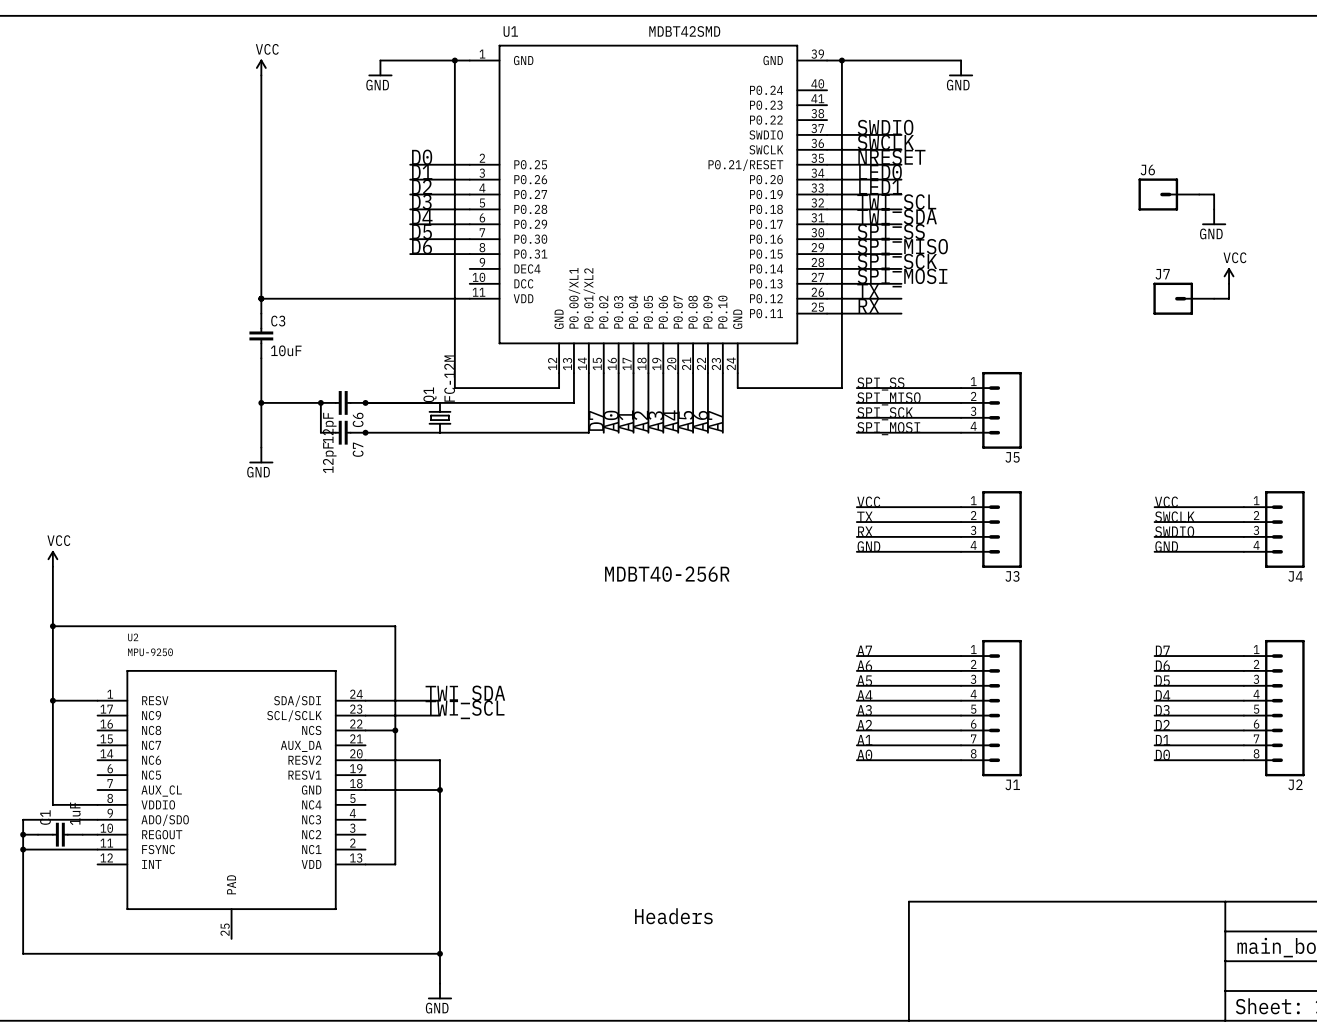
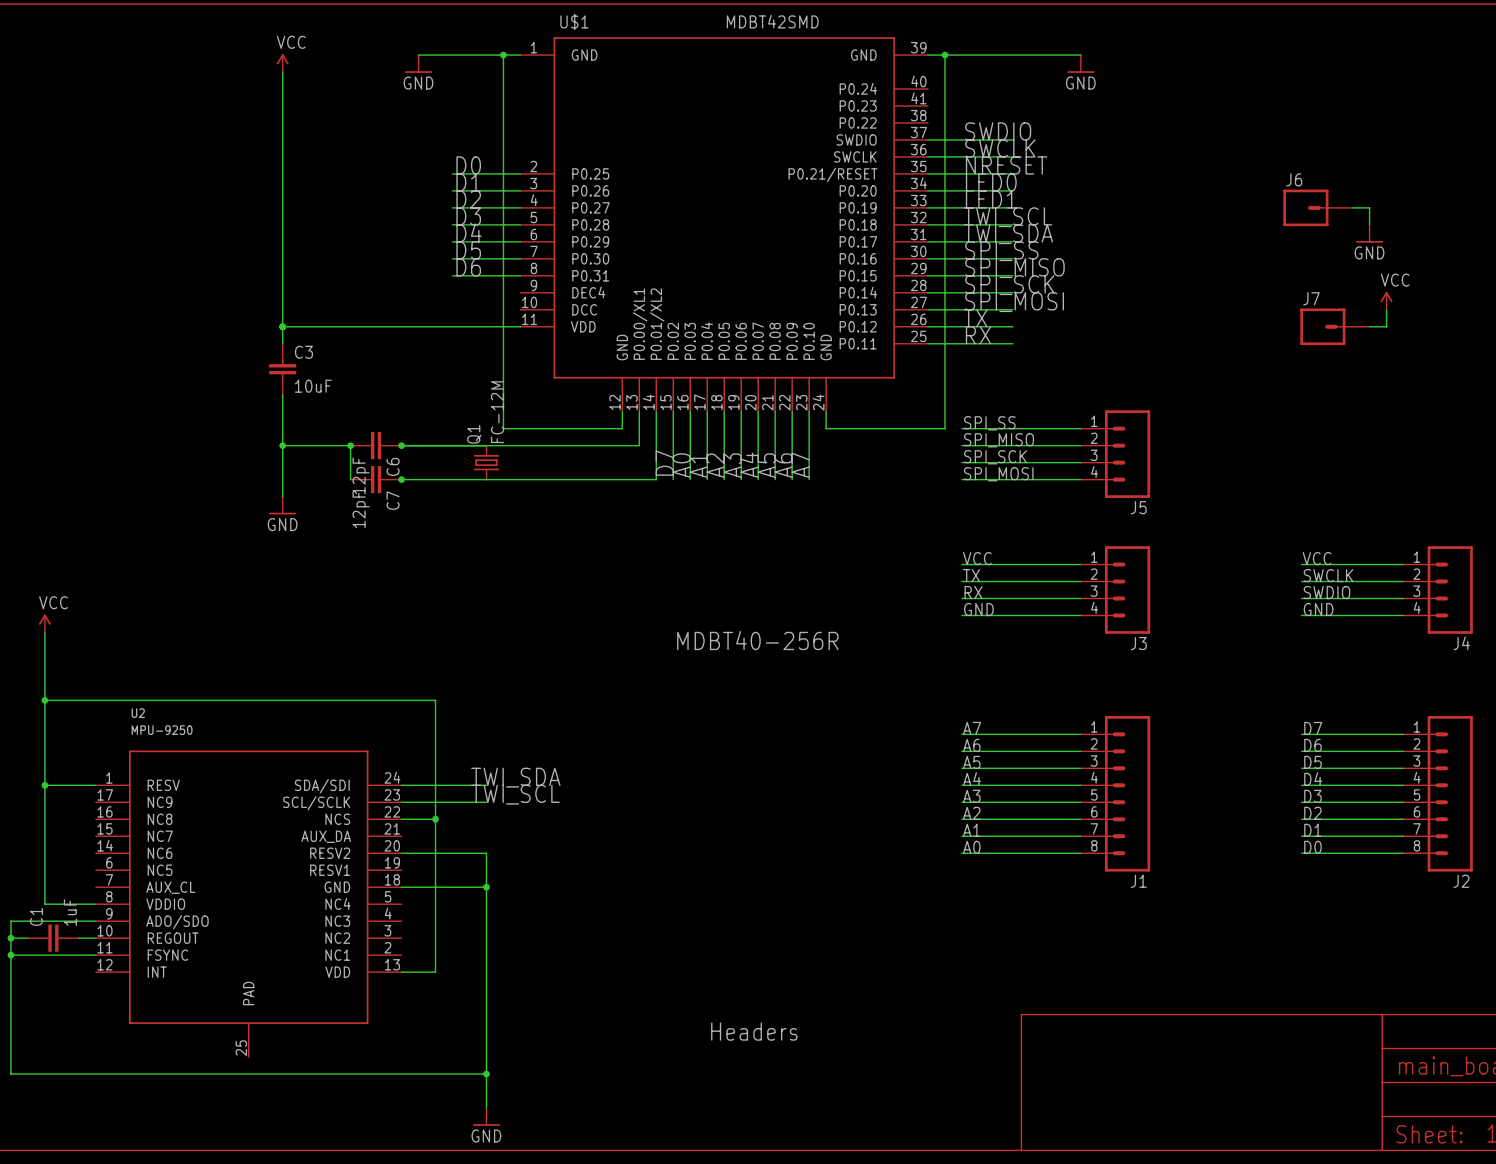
U1 name: U1 (510, 31) -> U$1 (574, 21)

